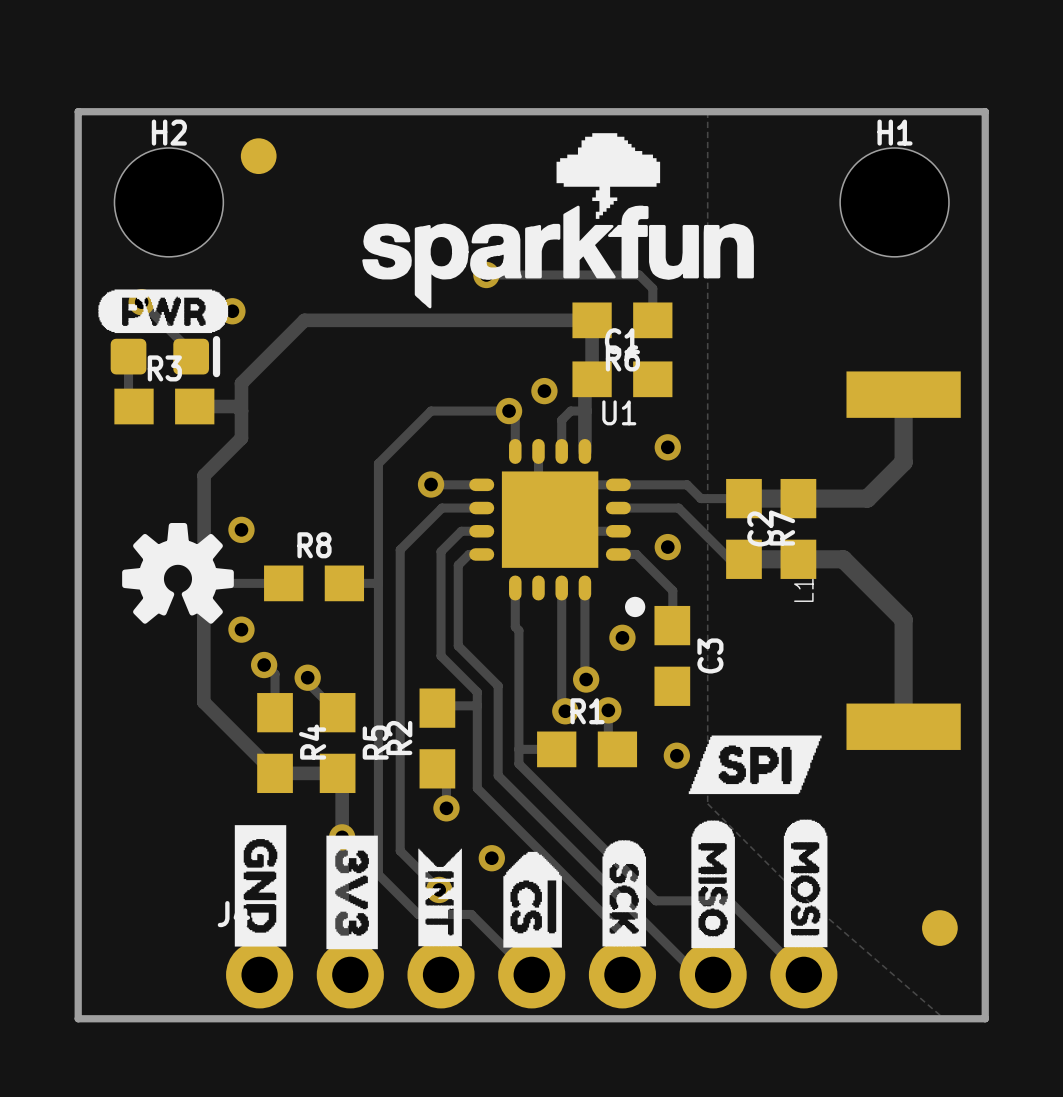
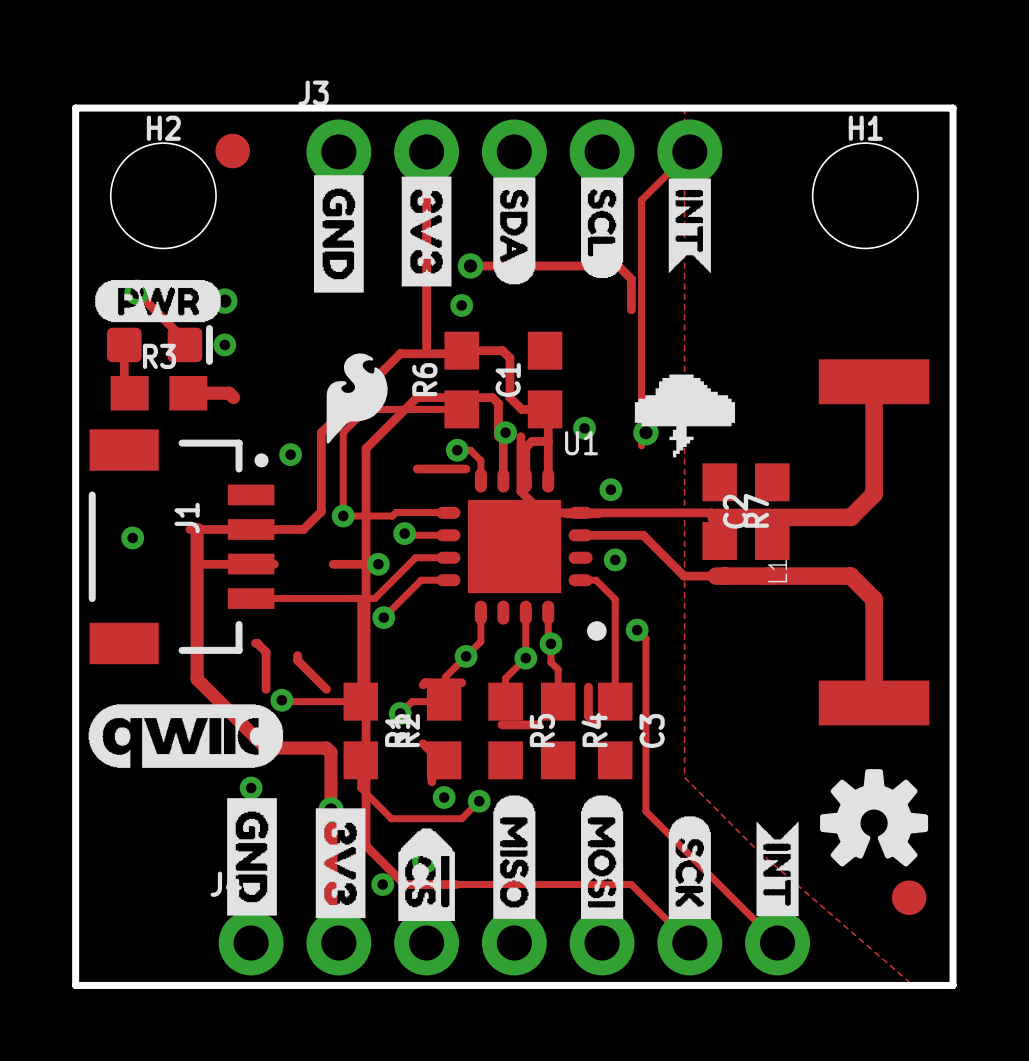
part position: (258, 156) -> (232, 151)
track: none -> (426, 151) (426, 353)
J3: none -> (514, 151)
track: none -> (689, 151) (641, 200) (641, 445)
drawing position: (608, 176) -> (684, 415)
drawing: none -> [313, 175, 452, 293]
drawing: none -> [581, 177, 624, 279]
drawing: none -> [668, 178, 711, 273]
drawing shape: [362, 205, 754, 309] -> [493, 177, 536, 285]
via: none -> (461, 305)
R6 rotation: 0° (622, 320) -> 90° clockwise (461, 380)
R6 position: (622, 320) -> (461, 380)
via: none -> (224, 344)
drawing: none -> [326, 353, 388, 444]
C1 rotation: 0° (622, 379) -> 90° clockwise (545, 380)
C1 position: (622, 379) -> (545, 380)
via: (544, 391) -> none
via: (509, 411) -> none
track: (584, 411) (570, 411) (561, 420) (561, 451) -> none
track: none -> (461, 409) (366, 409) (343, 432) (343, 516) (392, 516) (395, 512) (448, 512)
via: none -> (584, 428)
track: none -> (505, 432) (503, 434) (503, 480)
via: none -> (505, 432)
track: (584, 451) (584, 386) (592, 379) (592, 320) (304, 320) (241, 383) (241, 438) (204, 475) (204, 547) -> none
track: none -> (548, 441) (531, 441) (525, 447) (525, 480)
track: (903, 462) (867, 498) (700, 498) (687, 484) (586, 484) -> (874, 447) (874, 494) (850, 517) (716, 517) (711, 512) (519, 512) (503, 529) (503, 535) (514, 546)
track: none -> (457, 450) (470, 450) (480, 460) (480, 480)
via: none -> (457, 450)
via: none -> (290, 454)
via: (431, 484) -> none
track: none -> (548, 480) (548, 412) (545, 409) (521, 409) (509, 397) (509, 358) (502, 350) (461, 350) (458, 353) (400, 353) (321, 432) (321, 511) (303, 529) (189, 529)
via: none -> (610, 489)
track: (481, 508) (441, 508) (400, 549) (400, 850) (439, 889) -> none
track: (618, 508) (678, 508) (729, 559) (843, 559) (879, 595) -> (716, 576) (850, 576)
U1 position: (557, 528) -> (521, 554)
via: (241, 529) -> none
track: (481, 531) (461, 531) (441, 551) (441, 655) (477, 692) (477, 788) (622, 933) (622, 974) -> none
via: none -> (343, 516)
via: (667, 547) -> none
track: none -> (404, 533) (406, 535) (448, 535)
via: none -> (404, 533)
track: none -> (580, 535) (643, 535) (684, 576) (724, 576)
track: (481, 554) (469, 554) (458, 565) (458, 645) (498, 685) (498, 775) (697, 974) (713, 974) -> none
track: (618, 554) (636, 554) (672, 590) (672, 625) -> none
via: none -> (132, 537)
J1: none -> (181, 546)
drawing position: (177, 573) -> (874, 817)
track: none -> (448, 557) (415, 557) (374, 598) (251, 598)
via: none -> (615, 559)
R8: (314, 583) -> none
via: none -> (378, 564)
track: (515, 588) (515, 626) (518, 630) (518, 763) (655, 900) (728, 900) (803, 974) -> (637, 630) (645, 638) (645, 811) (777, 942)
track: (561, 588) (561, 714) (565, 711) -> none
track: (584, 588) (586, 679) -> none
track: none -> (448, 580) (421, 580) (383, 617)
track: none -> (580, 580) (596, 580) (615, 599) (615, 701)
track: none -> (360, 598) (360, 701) (281, 700)
via: (241, 629) -> none
track: none -> (480, 612) (480, 641) (445, 676) (445, 700) (444, 701) (412, 701) (400, 713)
track: none -> (525, 612) (525, 658) (505, 678) (505, 701)
track: none -> (548, 612) (548, 641) (550, 643) (550, 662) (558, 669) (558, 701)
via: (622, 637) -> none
via: none -> (383, 617)
via: none -> (637, 630)
C3 position: (672, 655) -> (615, 731)
via: (264, 665) -> none
via: (307, 677) -> none
via: none -> (466, 656)
via position: (586, 679) -> (550, 643)
via: none -> (525, 658)
via: (608, 710) -> none
via: (565, 711) -> none
via: none -> (281, 700)
drawing: none -> [88, 704, 284, 768]
drawing: [688, 735, 822, 795] -> none
via: none -> (400, 713)
R2 position: (437, 738) -> (444, 731)
R4 position: (275, 743) -> (558, 731)
R5 position: (337, 743) -> (505, 731)
R1 rotation: 0° (587, 749) -> 90° clockwise (360, 731)
R1 position: (587, 749) -> (360, 731)
via: (676, 755) -> none
track: none -> (360, 760) (360, 788) (391, 818) (461, 818) (479, 801)
via position: (446, 808) -> (444, 797)
via: none -> (251, 788)
via: none -> (479, 801)
via: (491, 858) -> none
drawing position: (805, 883) -> (602, 857)
drawing position: (713, 884) -> (514, 857)
drawing position: (624, 893) -> (689, 867)
drawing position: (440, 897) -> (777, 869)
drawing position: (532, 899) -> (426, 874)
via: none -> (382, 884)
track: (471, 914) (531, 974) -> (455, 884) (631, 884) (689, 942)

